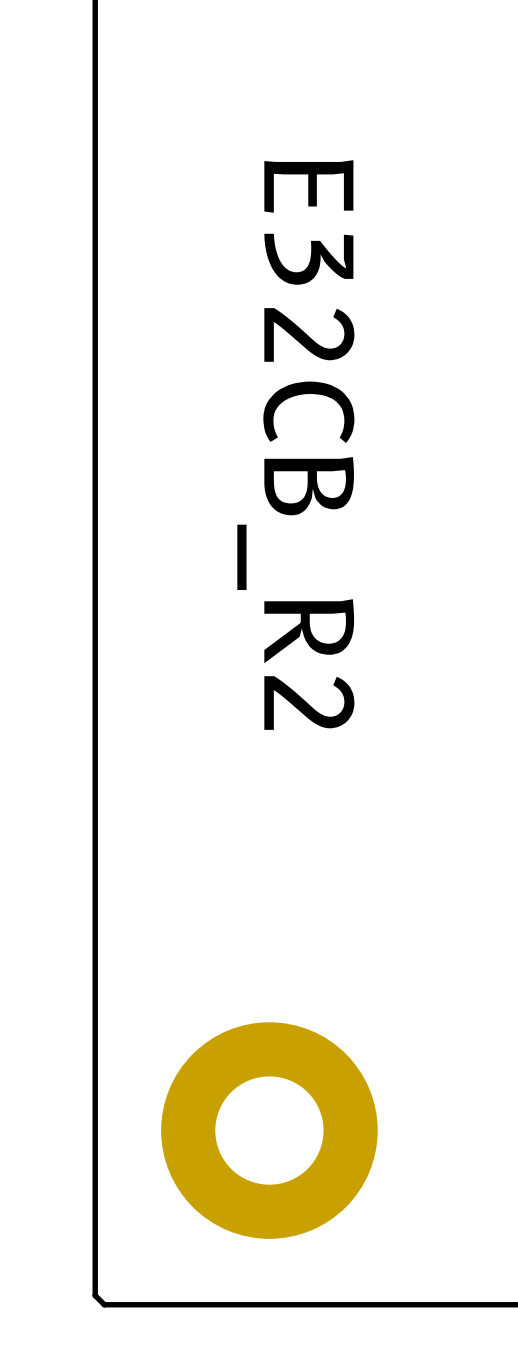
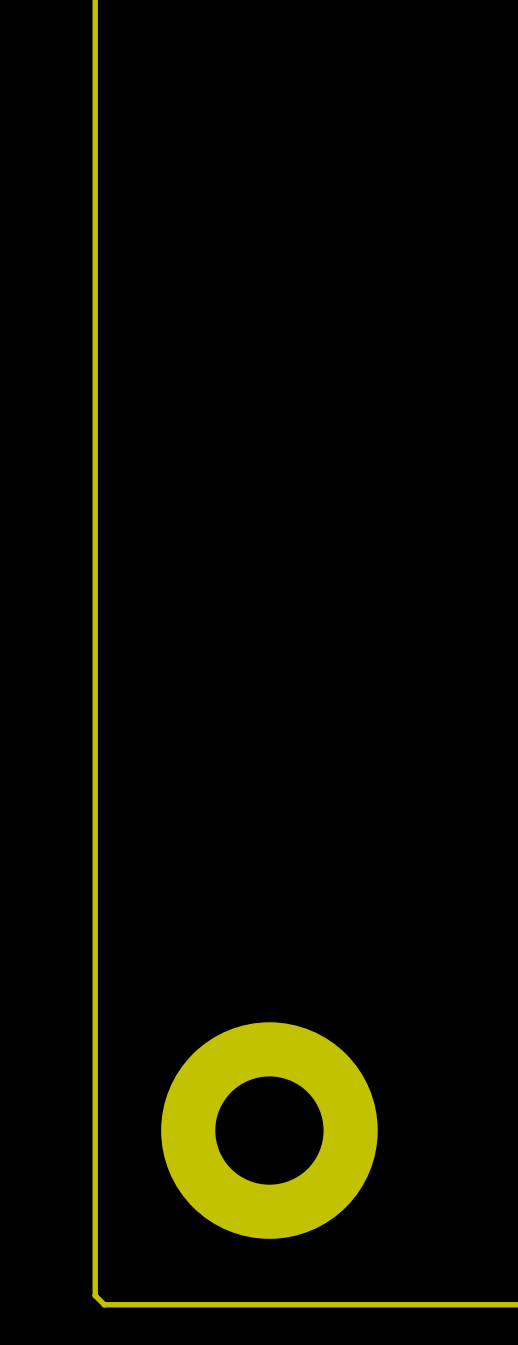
text: E32CB_R2 (295, 445) -> none

